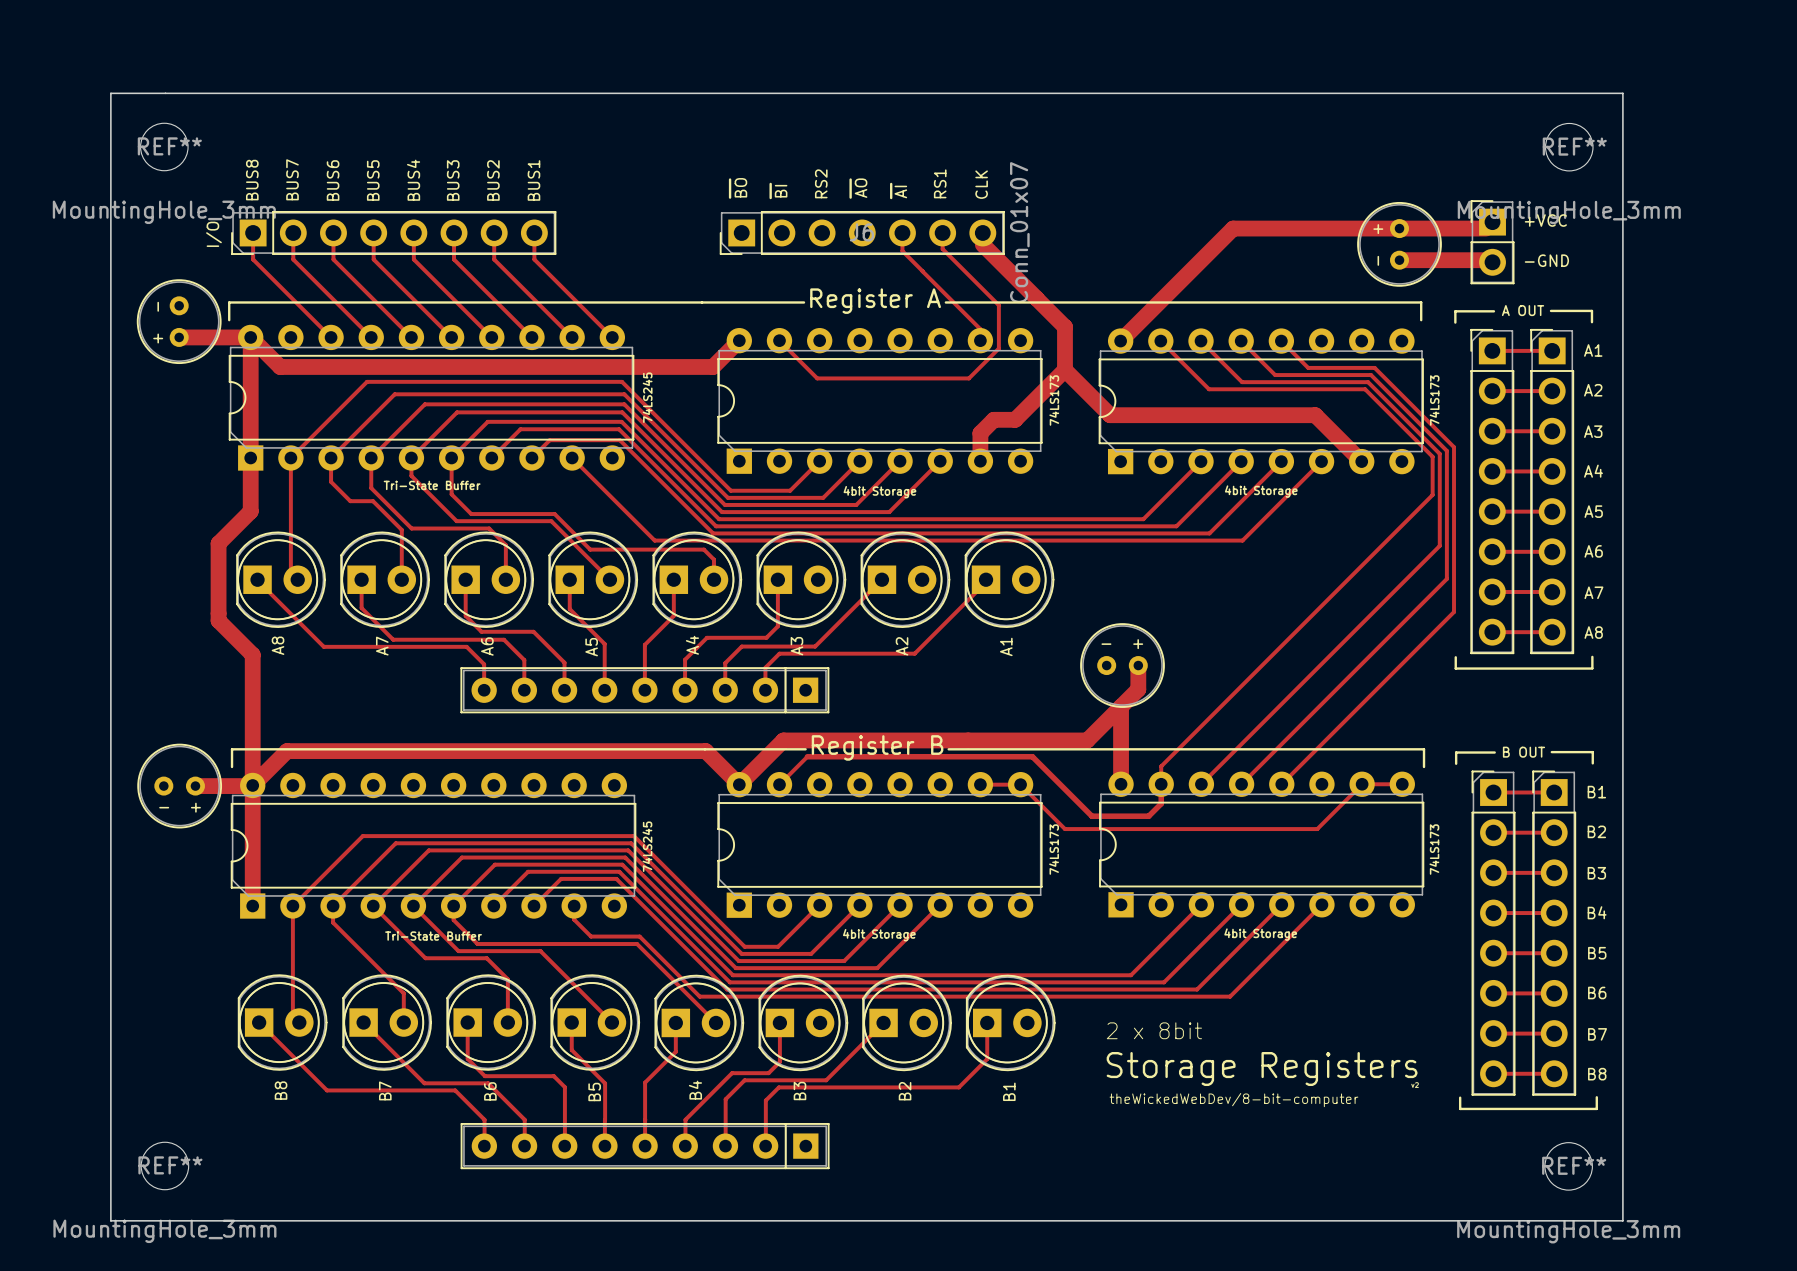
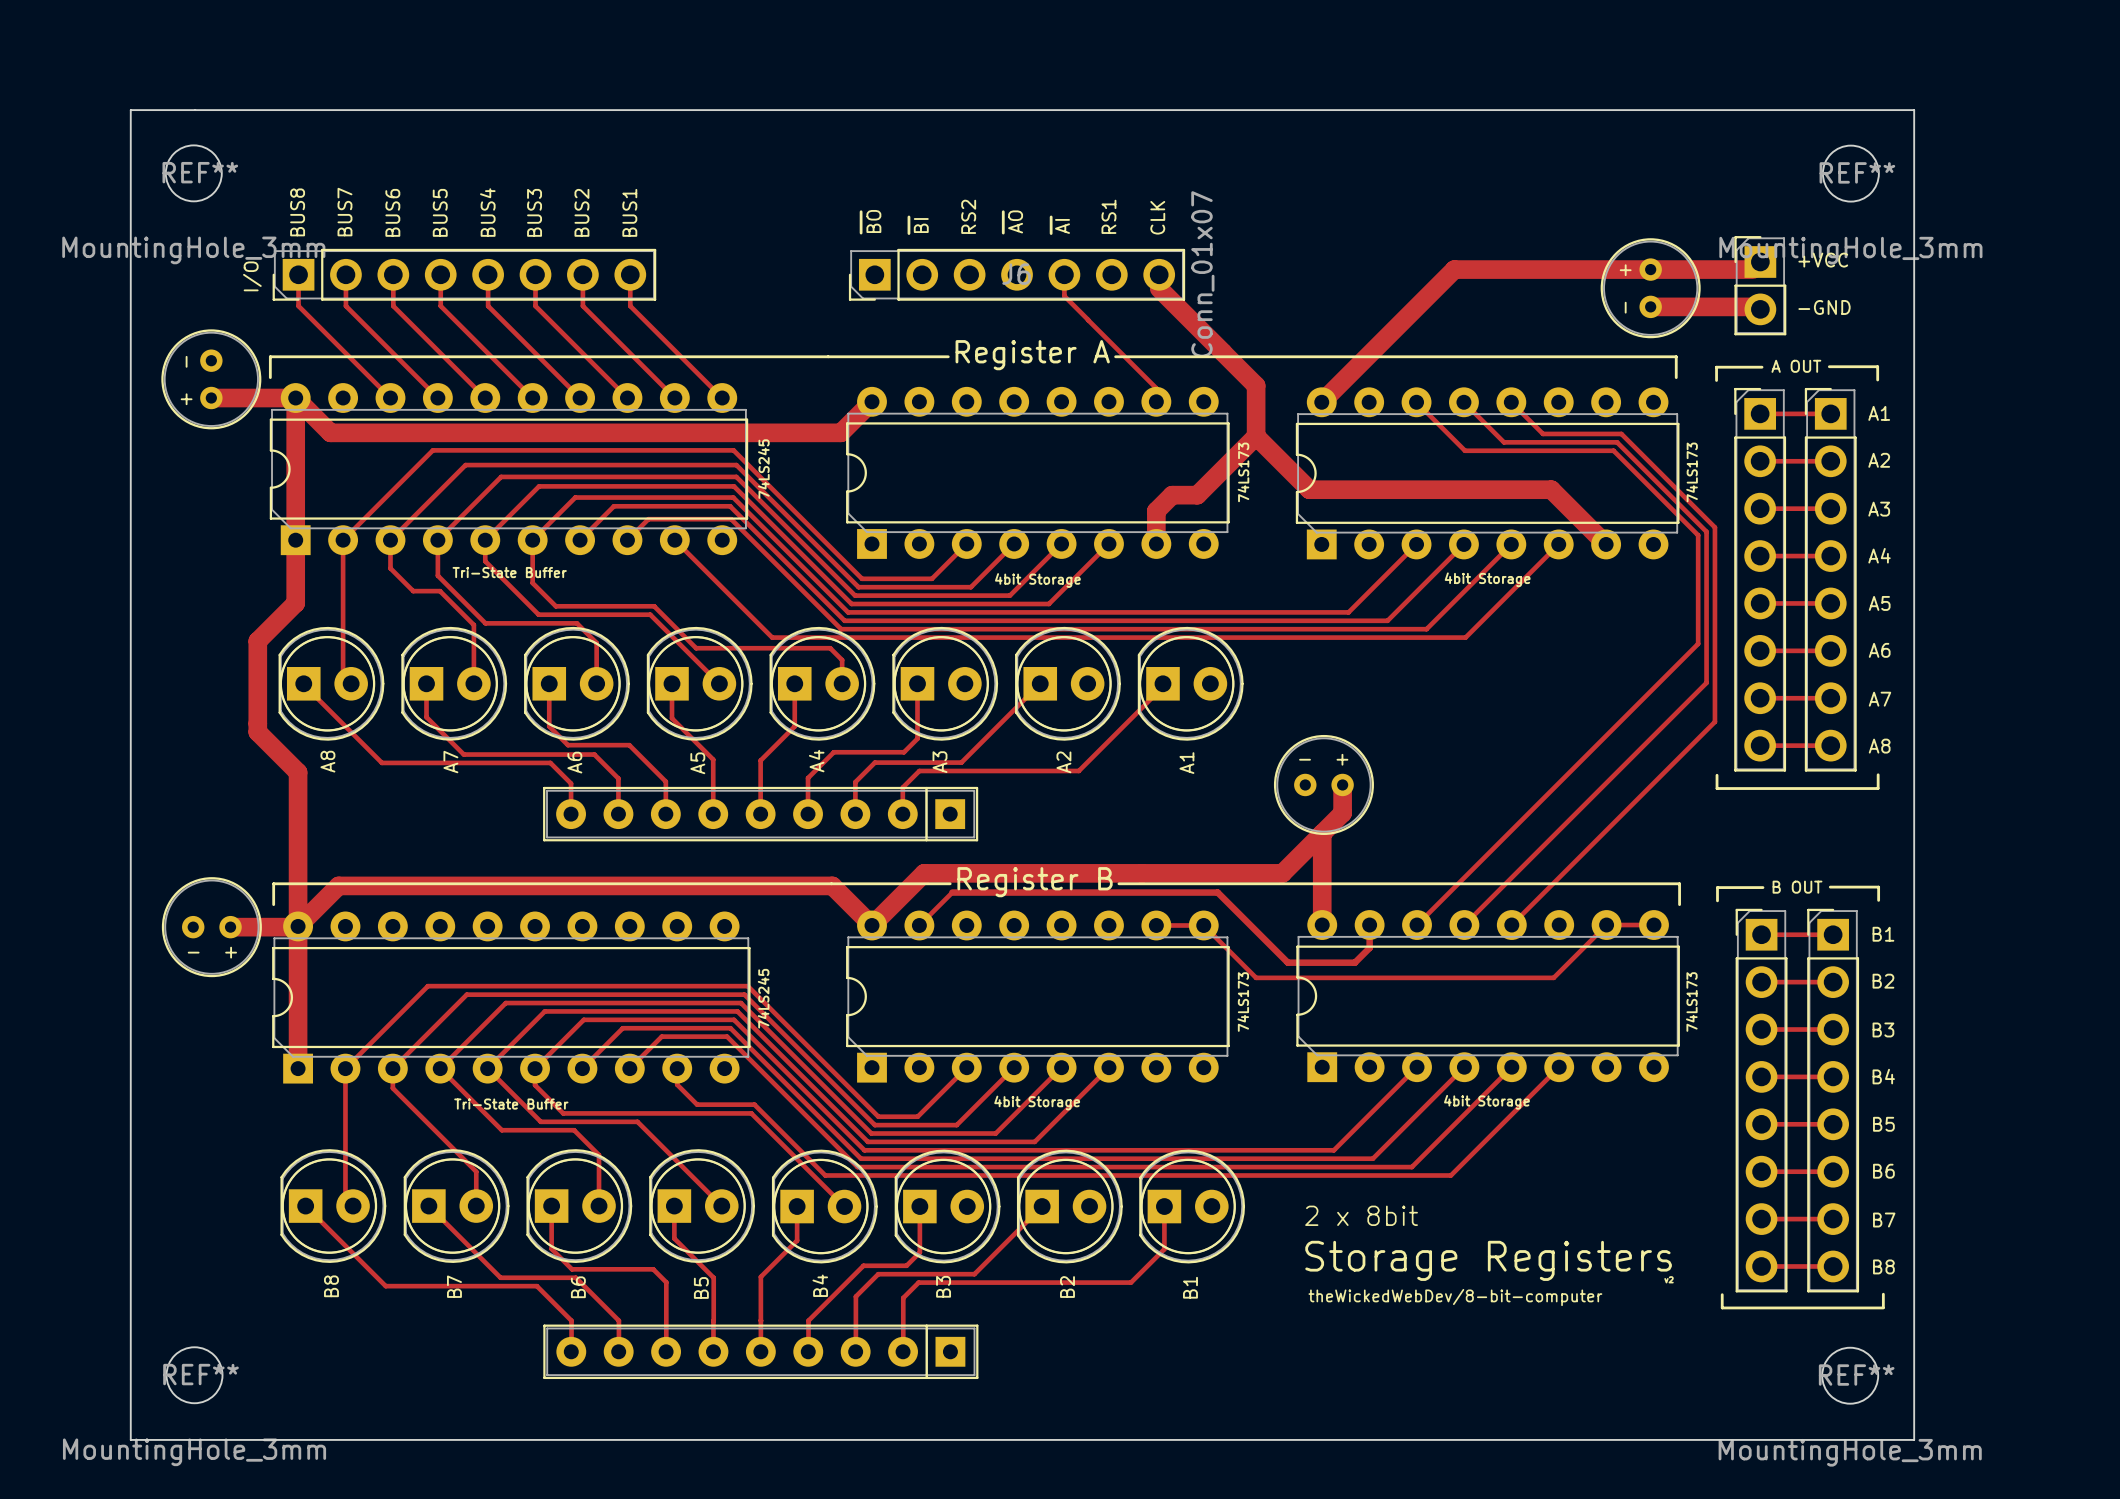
track: (942, 232) (942, 249) (998, 305) (998, 348) (968, 378) (817, 378) (779, 340) -> none
track: (1160, 341) (1209, 389) (1365, 389) (1432, 456) (1432, 494) (1161, 766) (1161, 784) -> none

